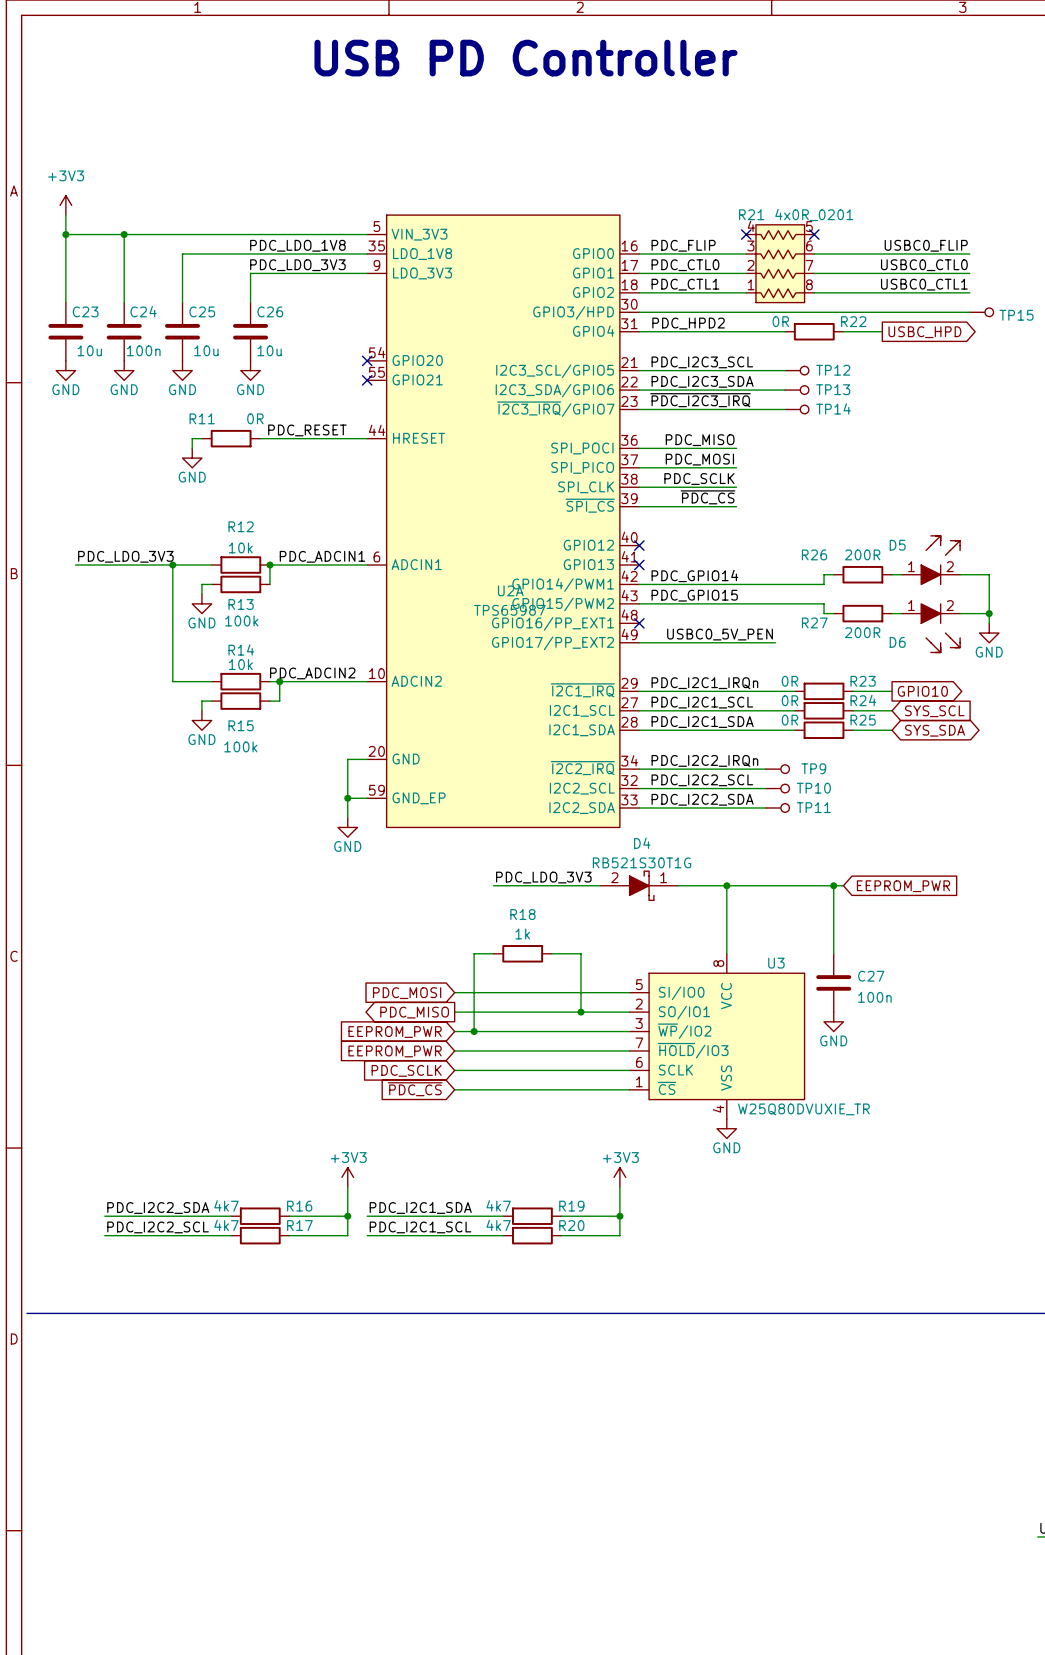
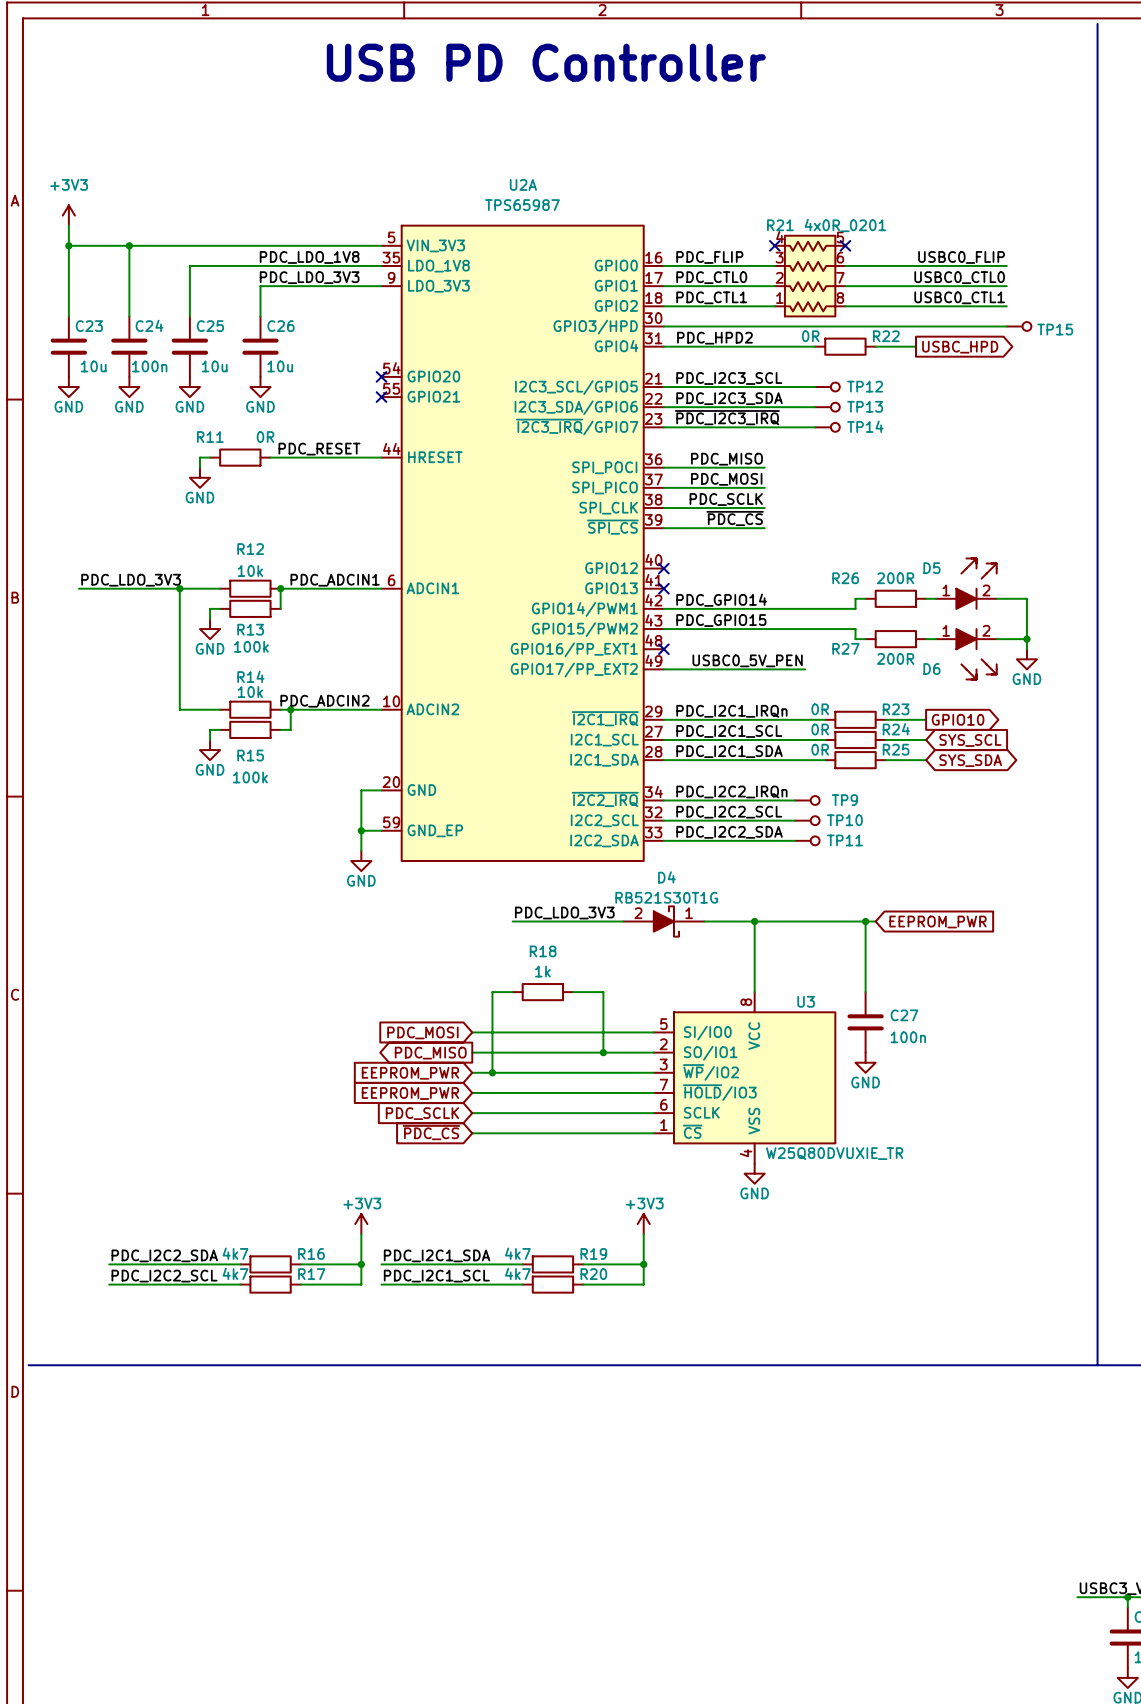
U2A name position: U2A (510, 590) -> U2A (523, 184)
U2A value position: TPS65987 (509, 610) -> TPS65987 (522, 205)

